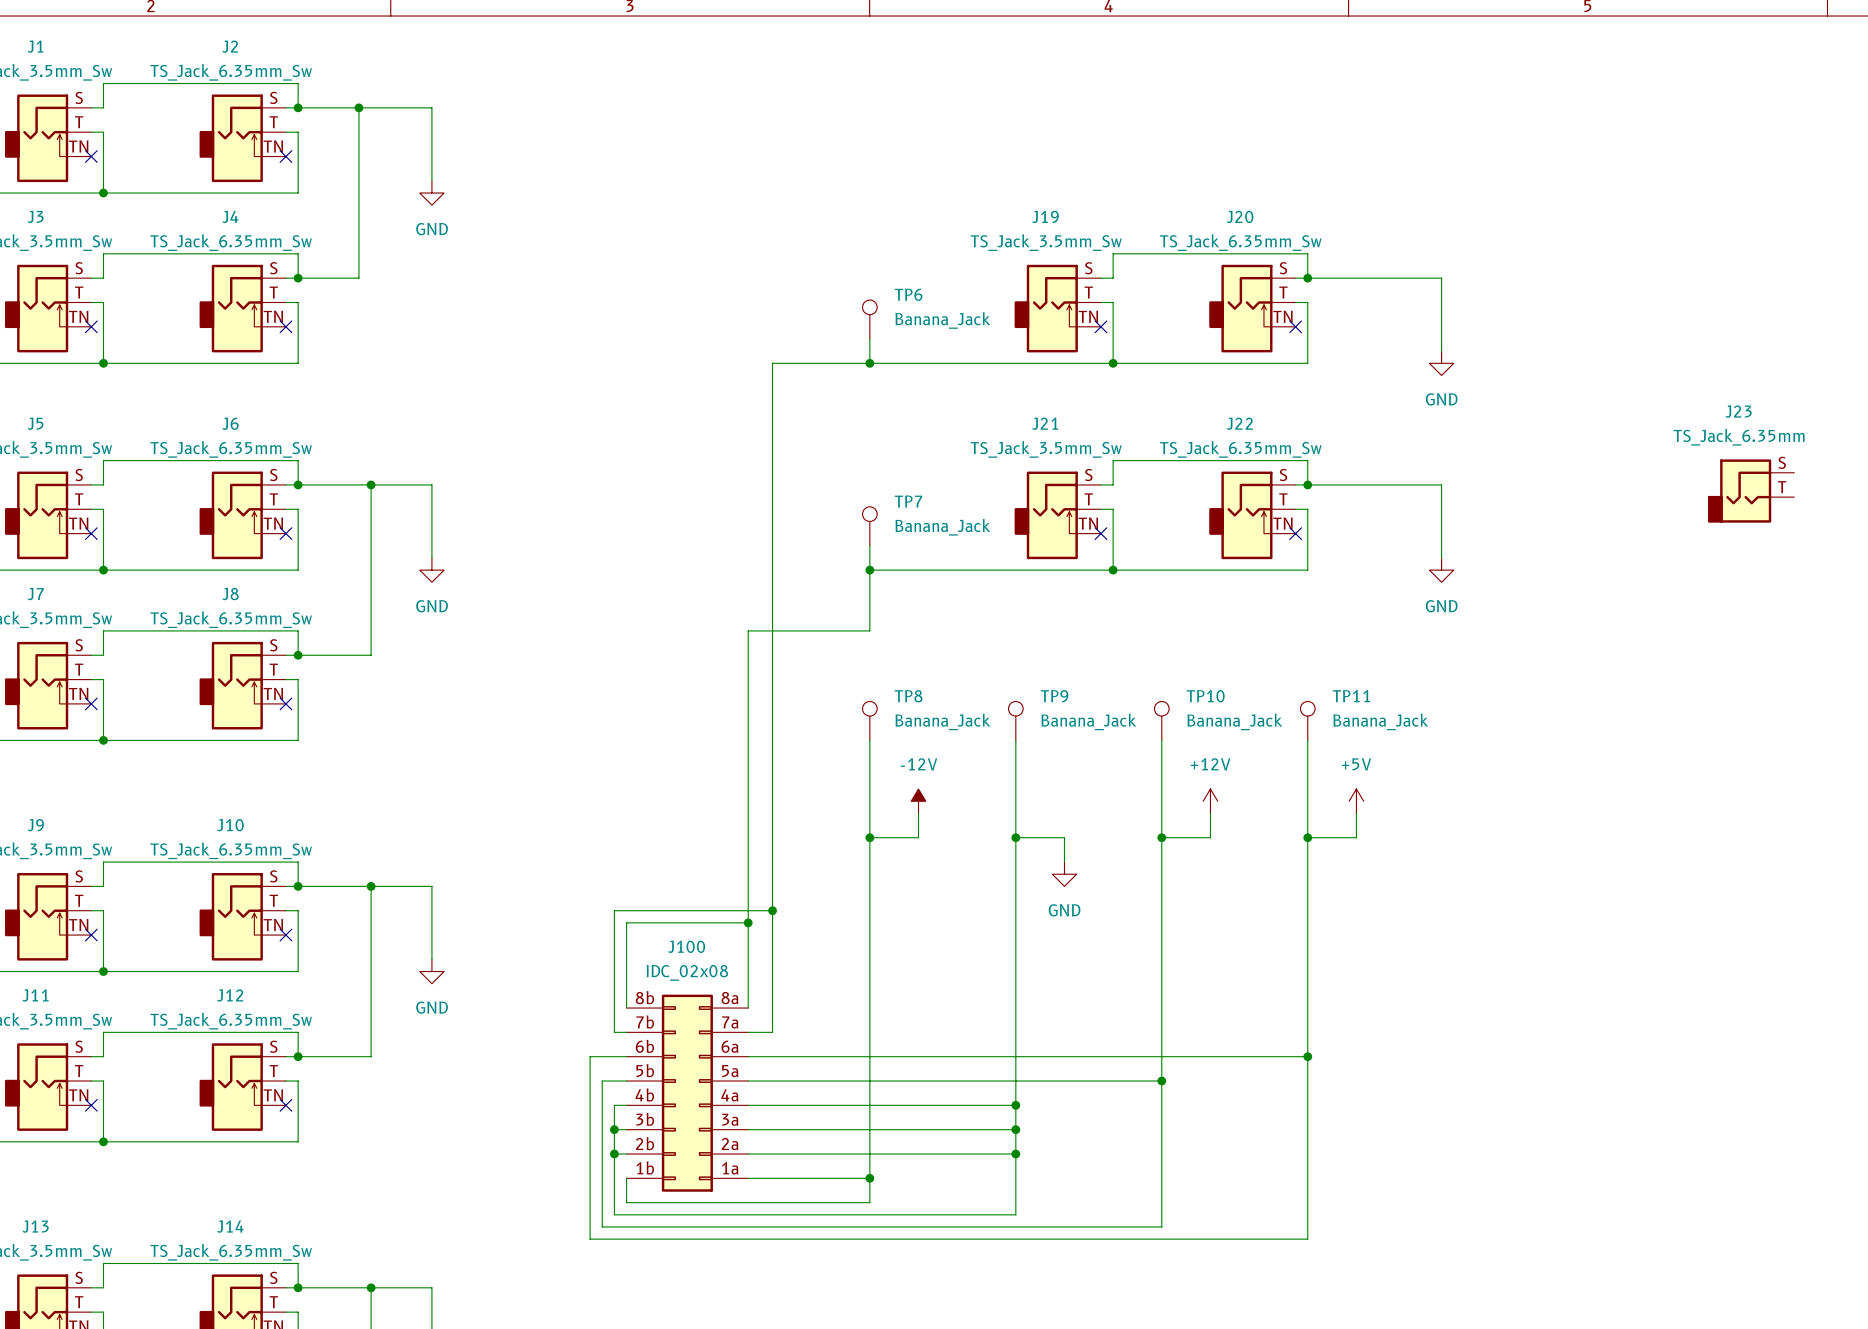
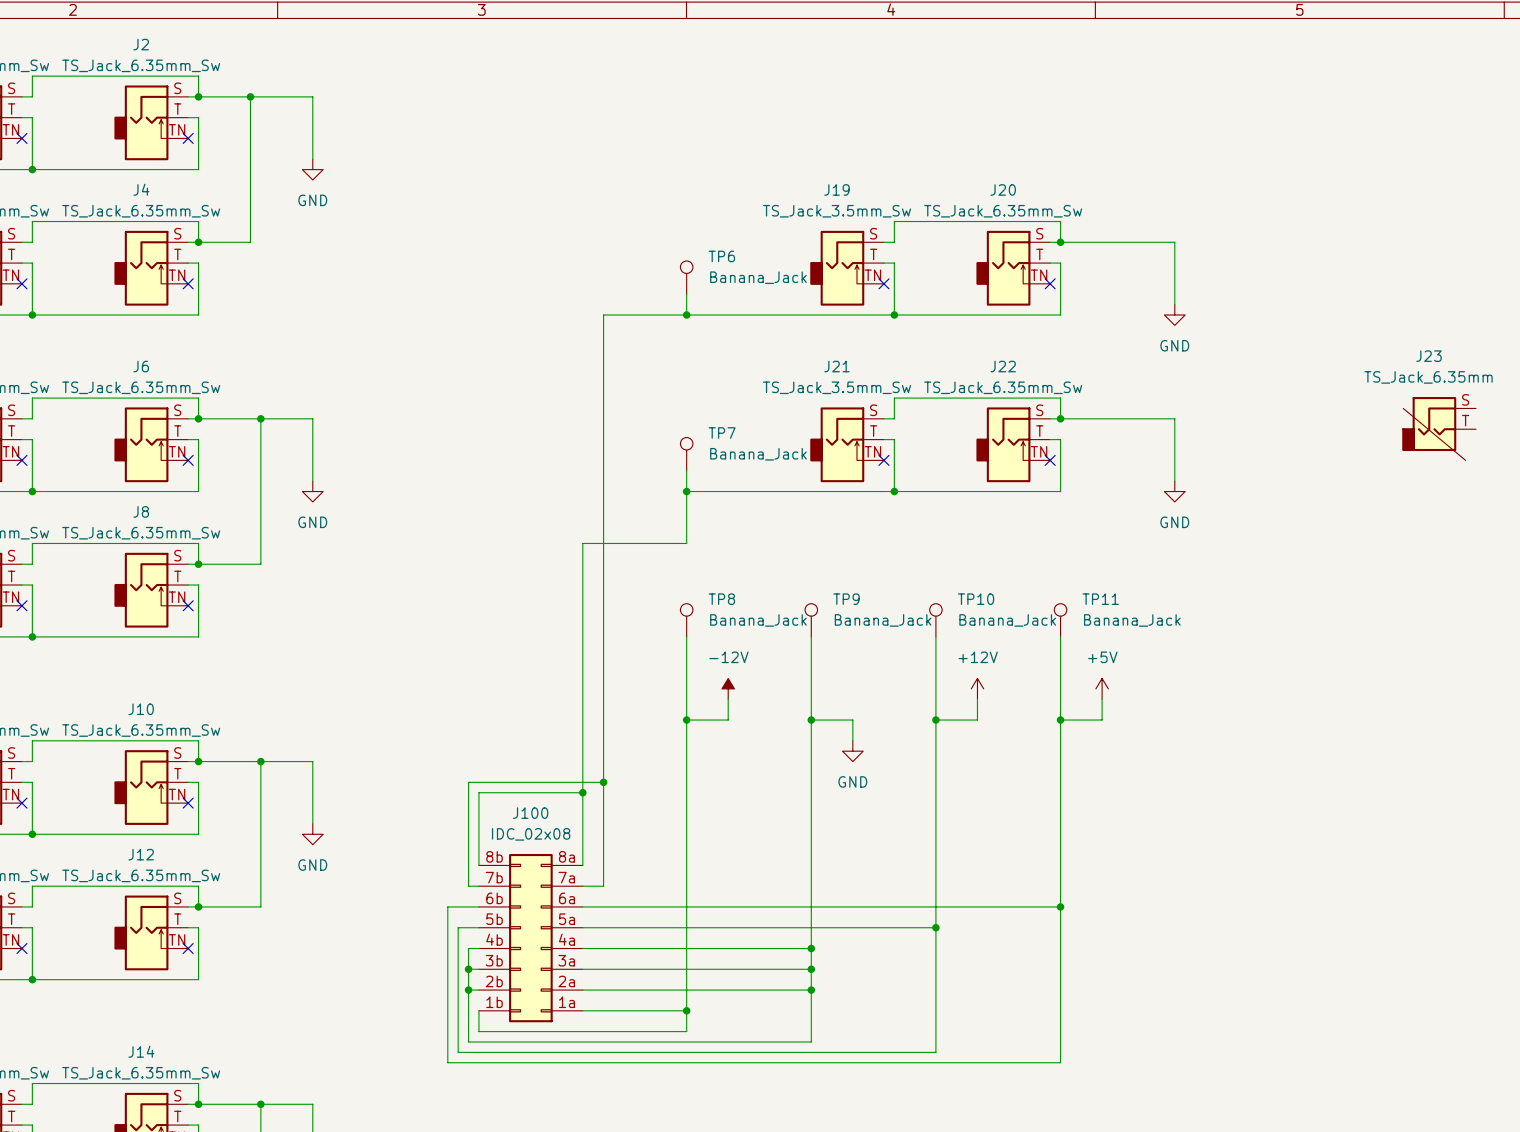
J23 symbol: [1707, 459, 1795, 523] -> [1402, 397, 1476, 461]

